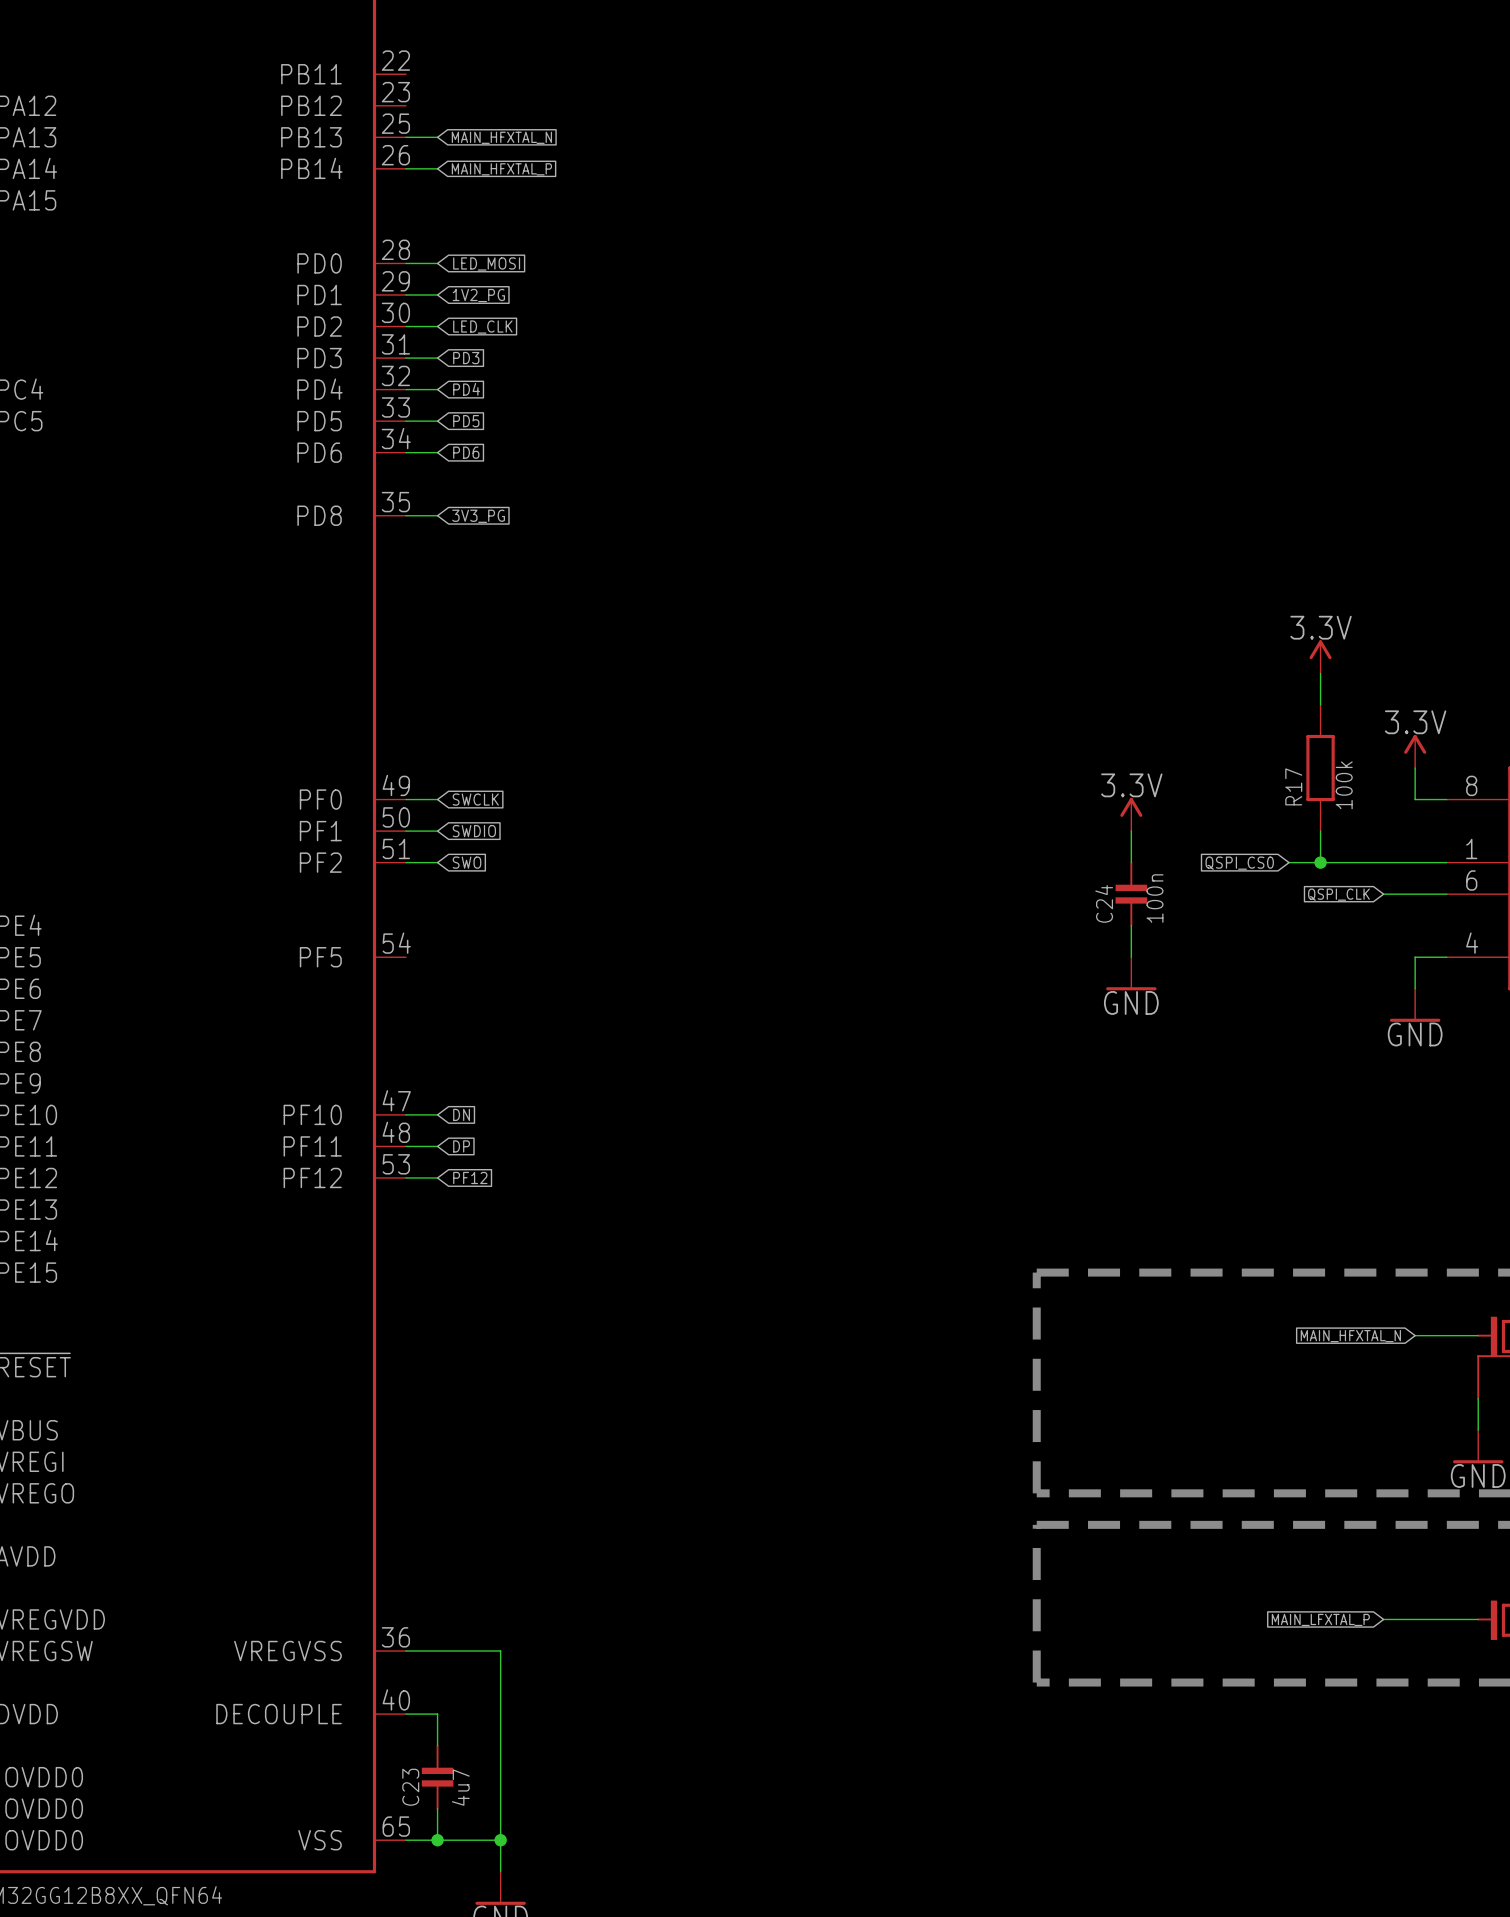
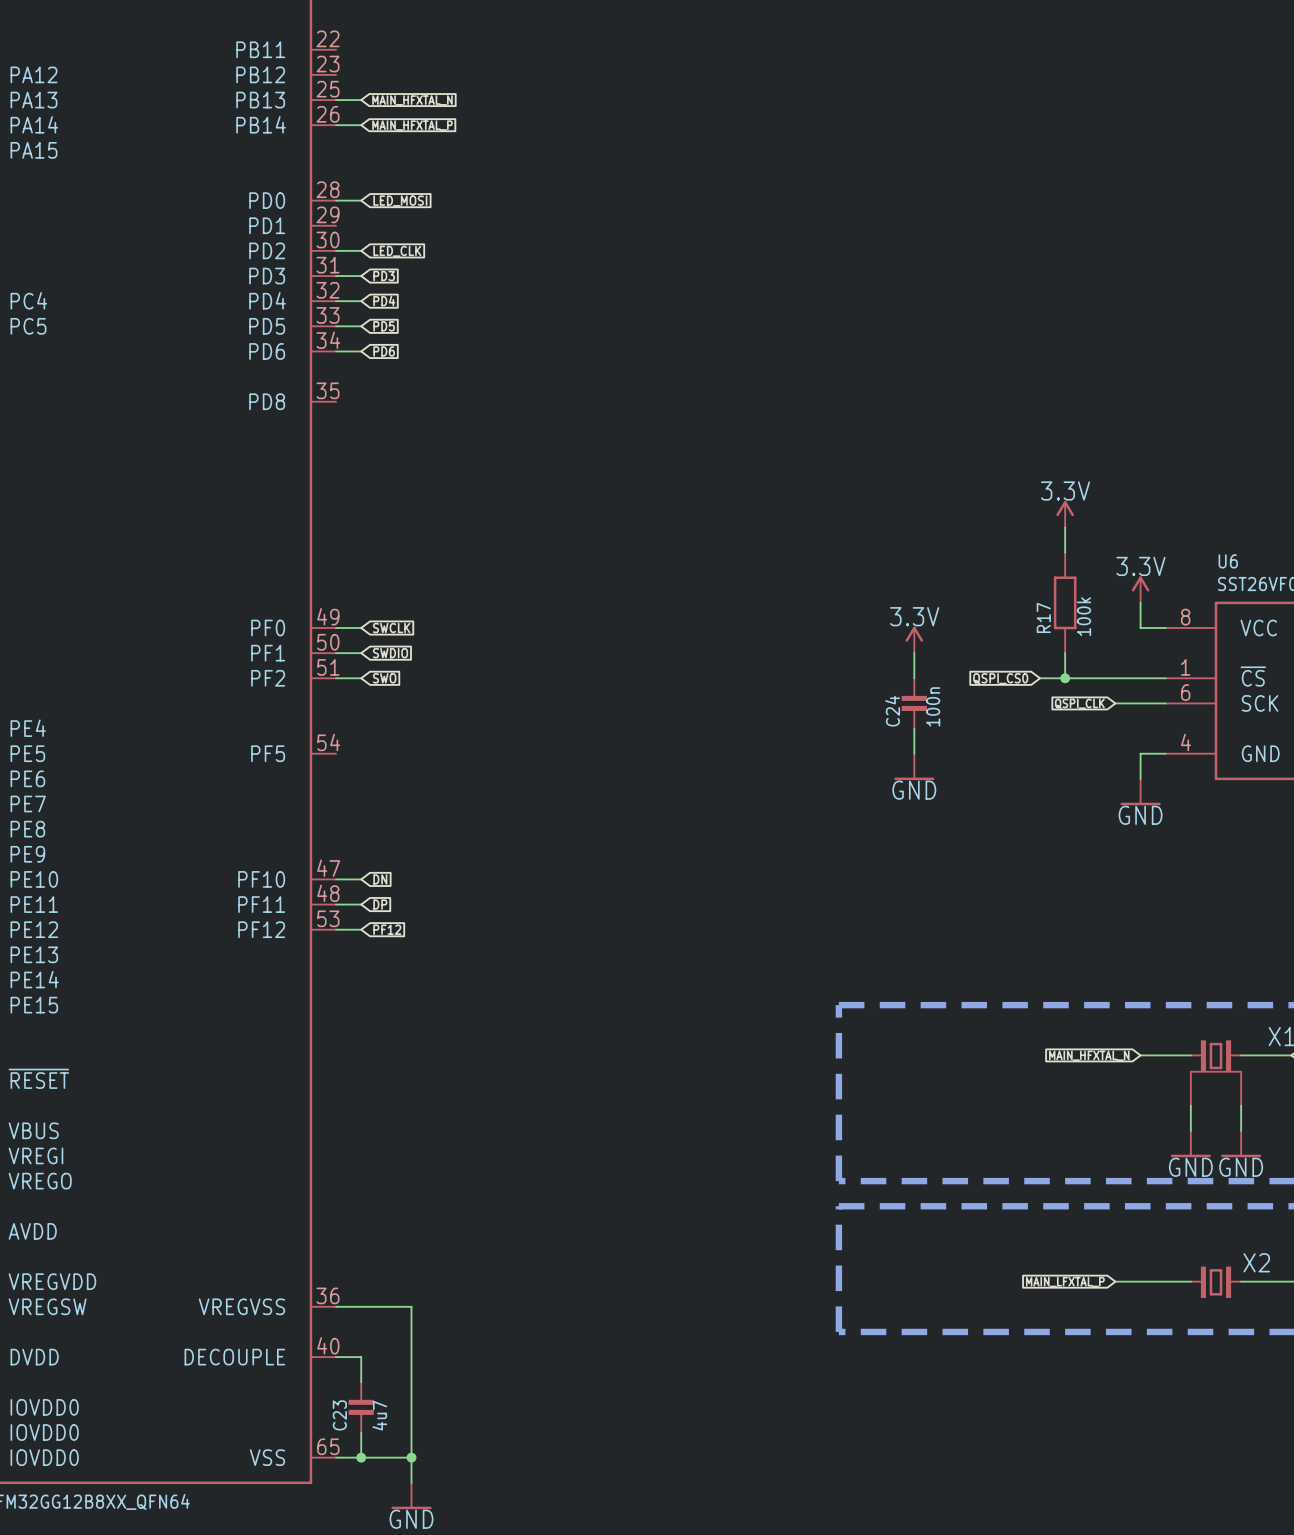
wire: (406, 294) (437, 294) -> none
global label: 1V2_PG (478, 295) -> none
wire: (406, 515) (437, 515) -> none
global label: 3V3_PG (478, 516) -> none

